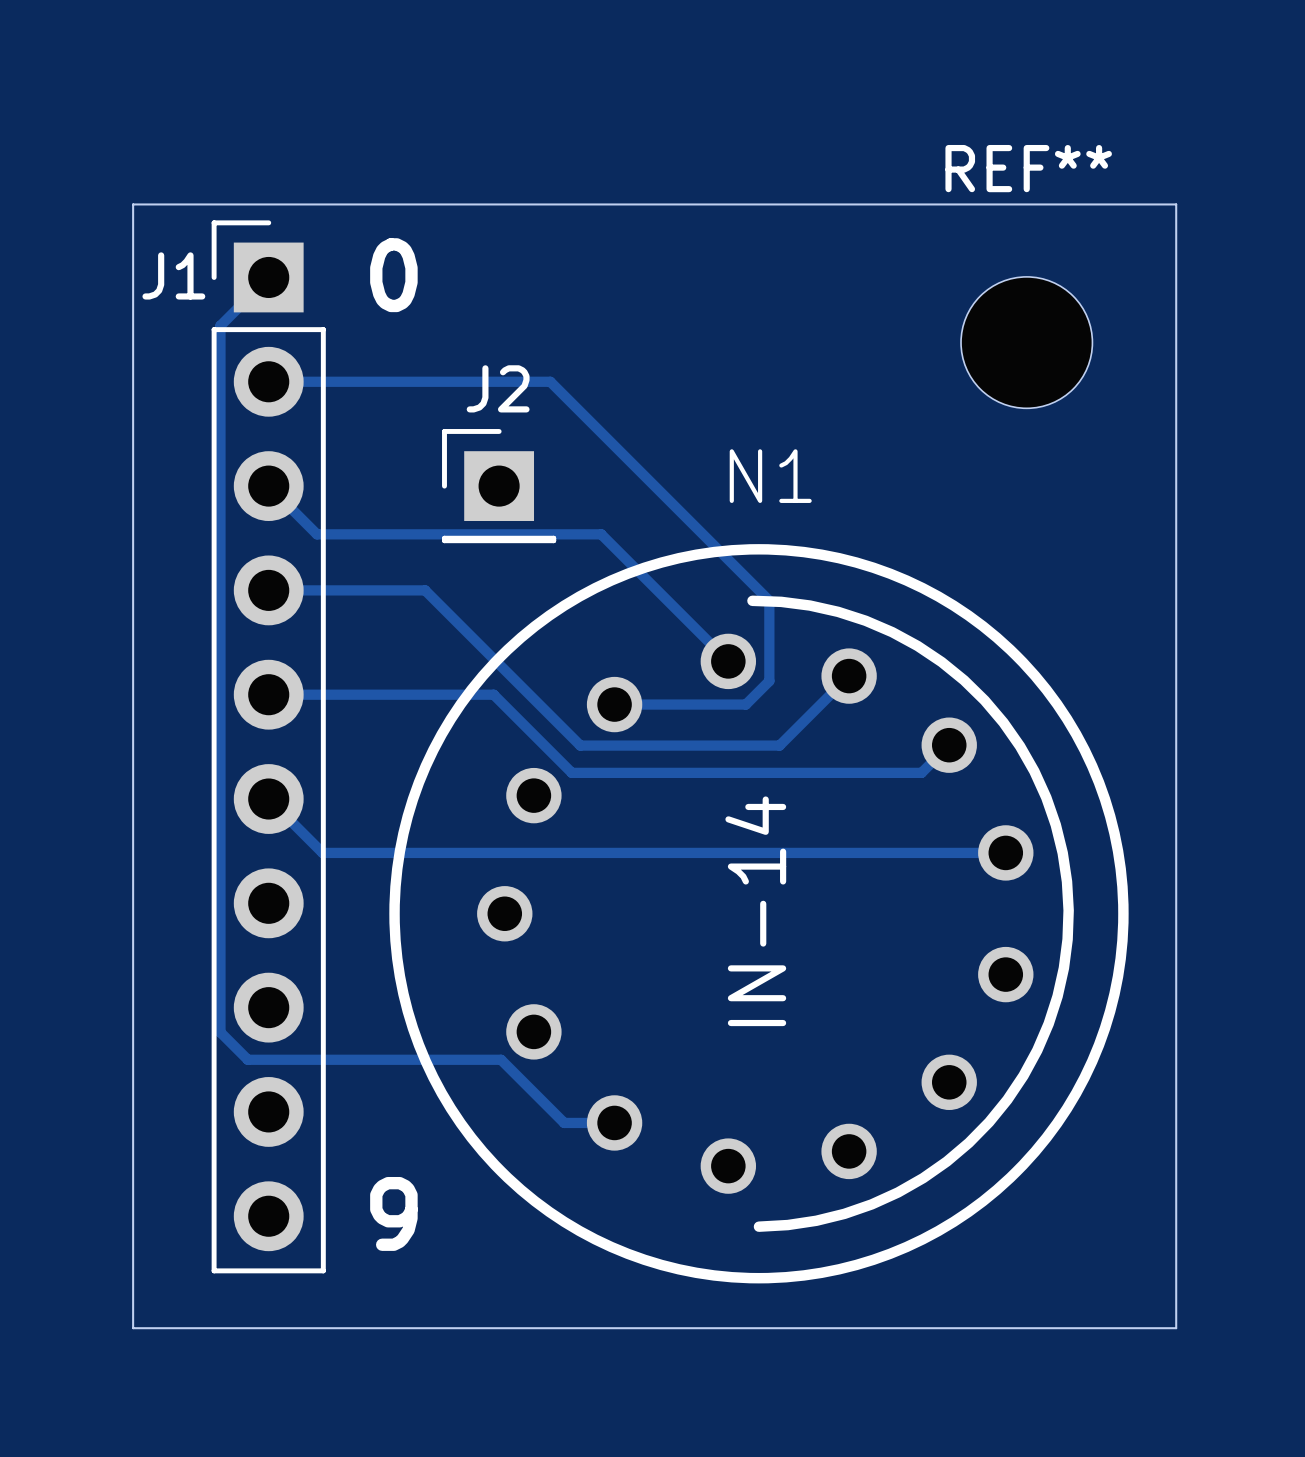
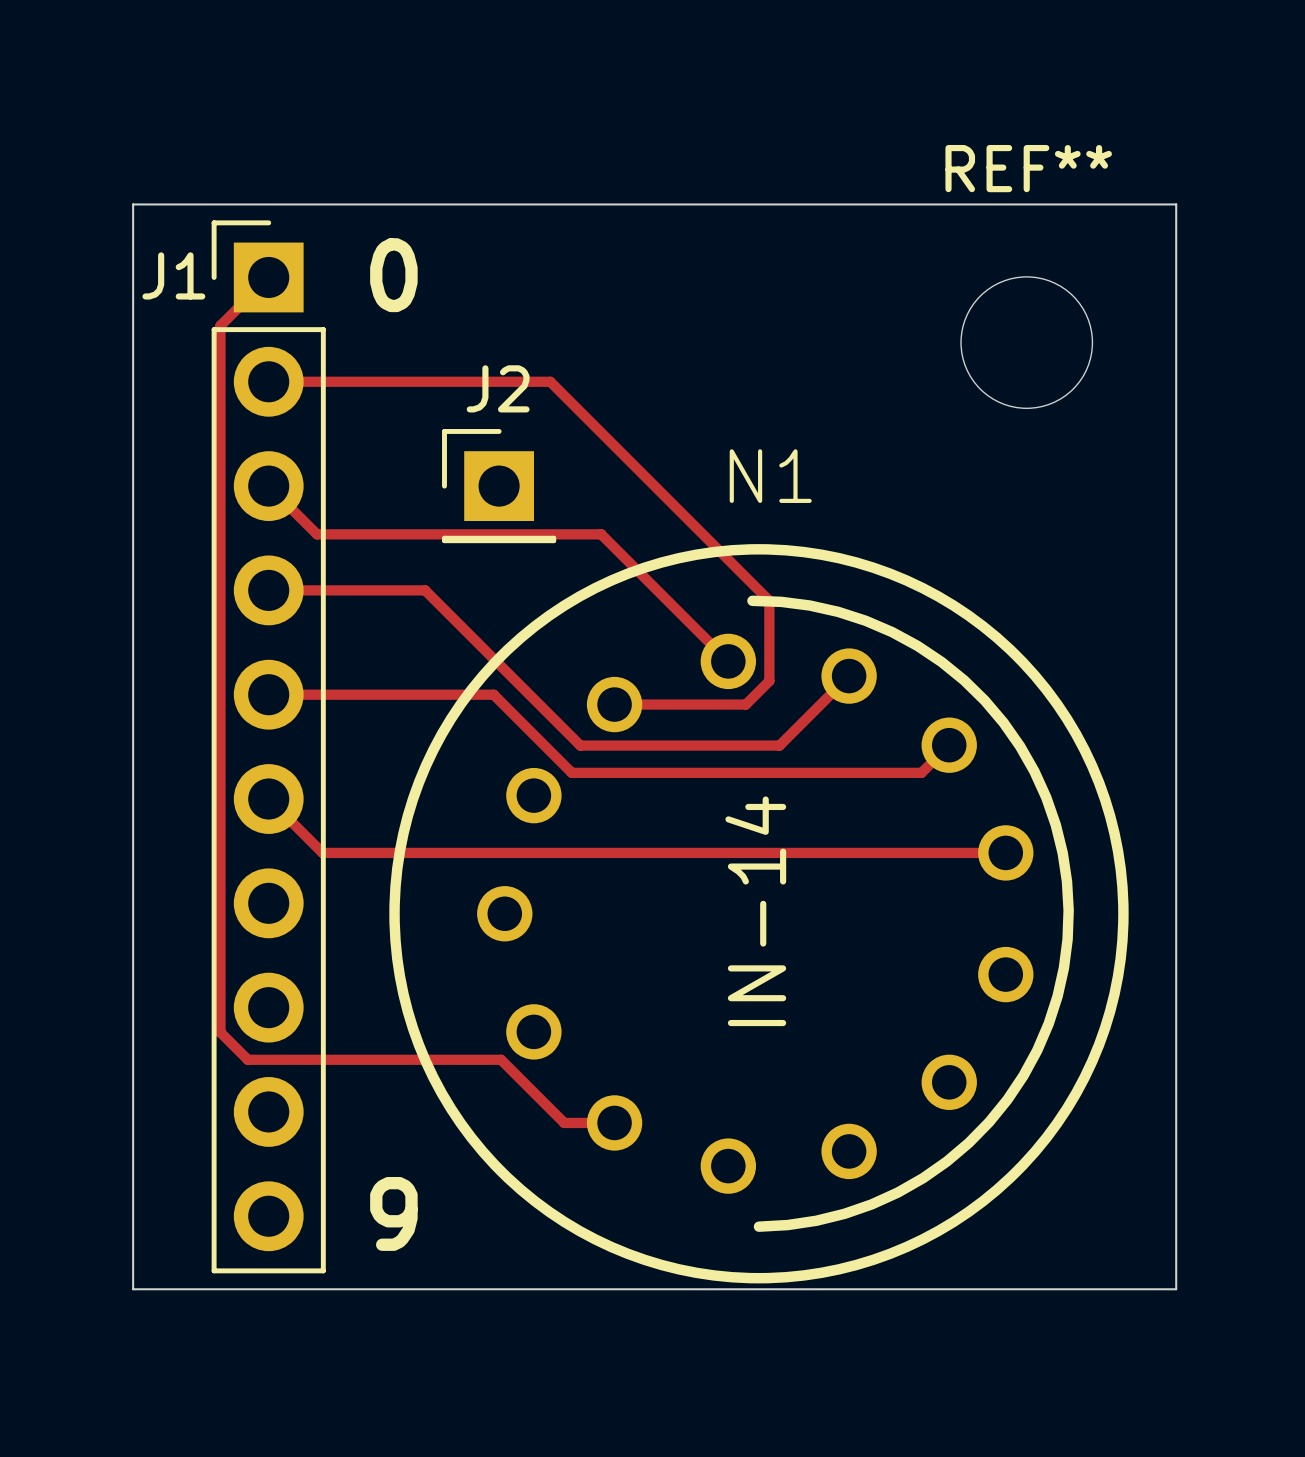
board edge: (133, 1289) (133, 1328) (1176, 1328) (1176, 1289) -> (133, 1289) (1176, 1289)

